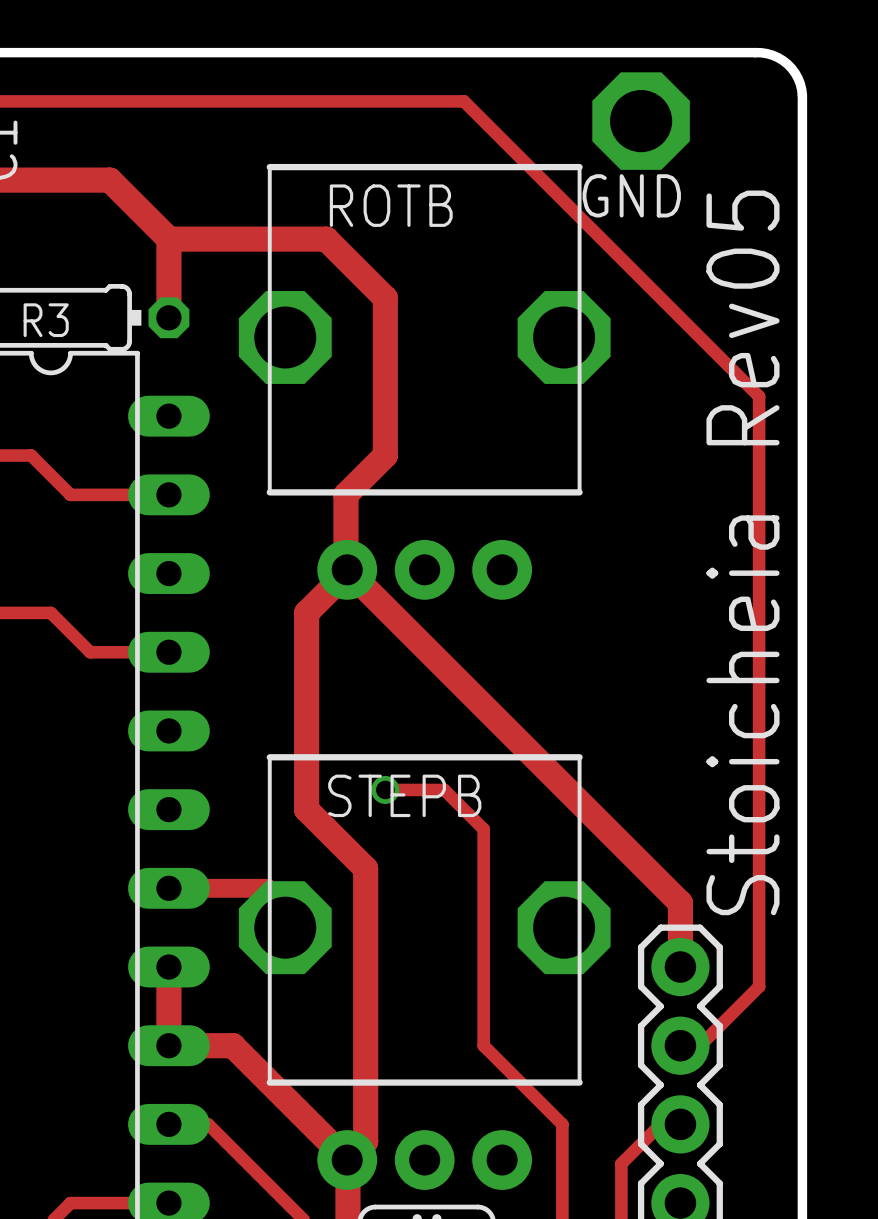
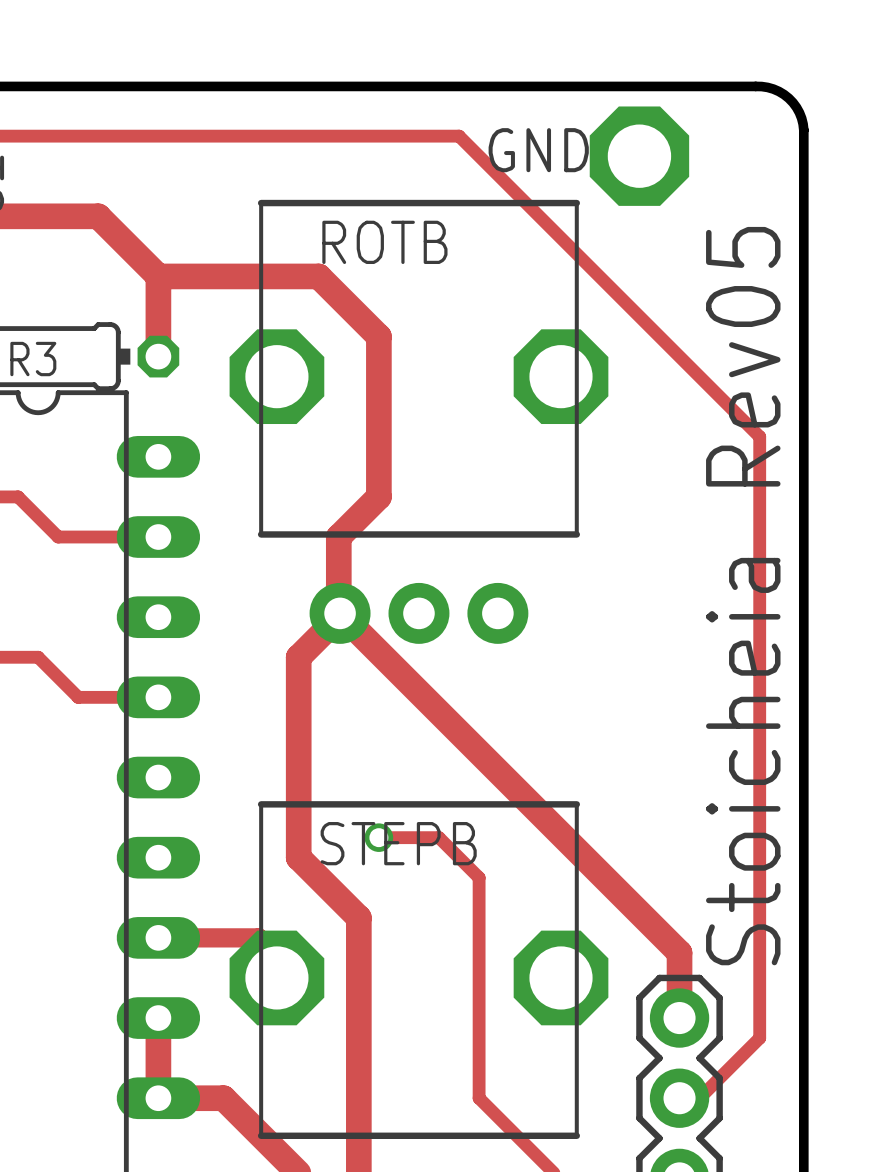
GND name position: GND (631, 195) -> GND (538, 150)

